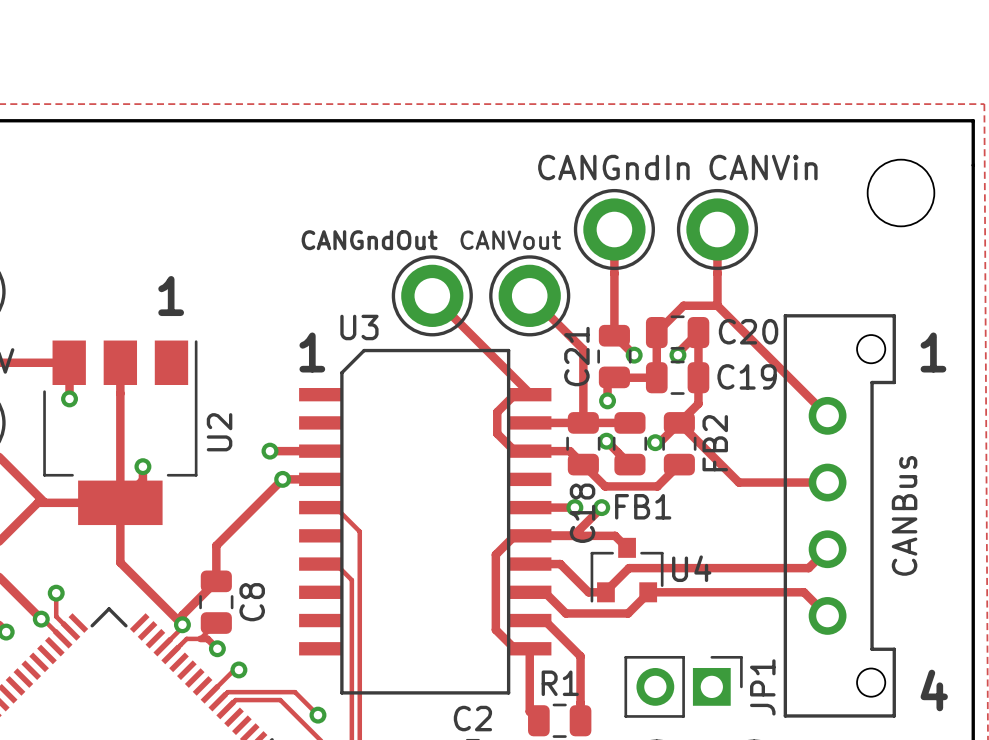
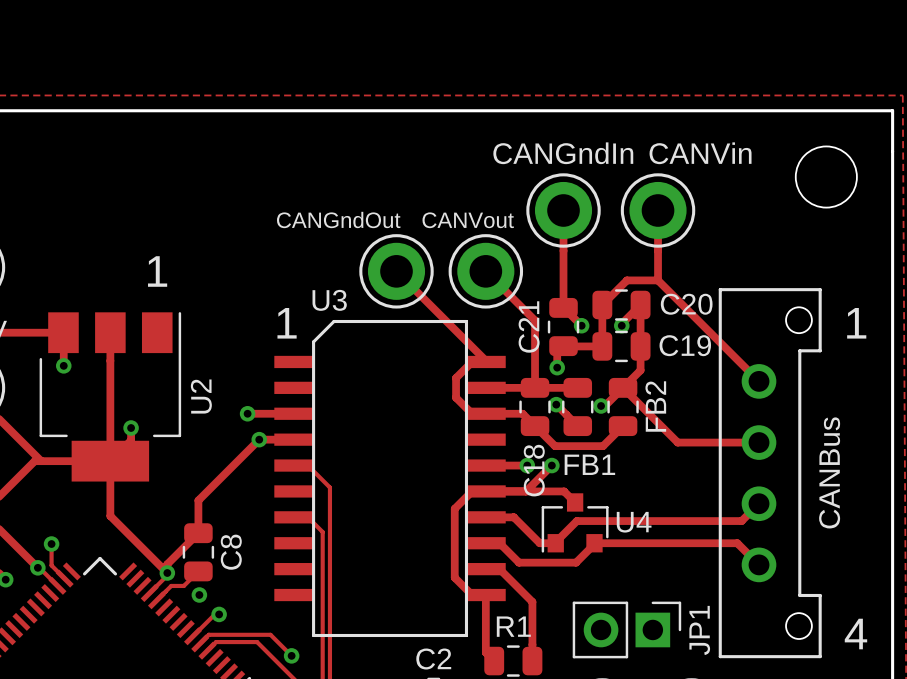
track: (200, 638) (207, 638) (217, 648) -> none

